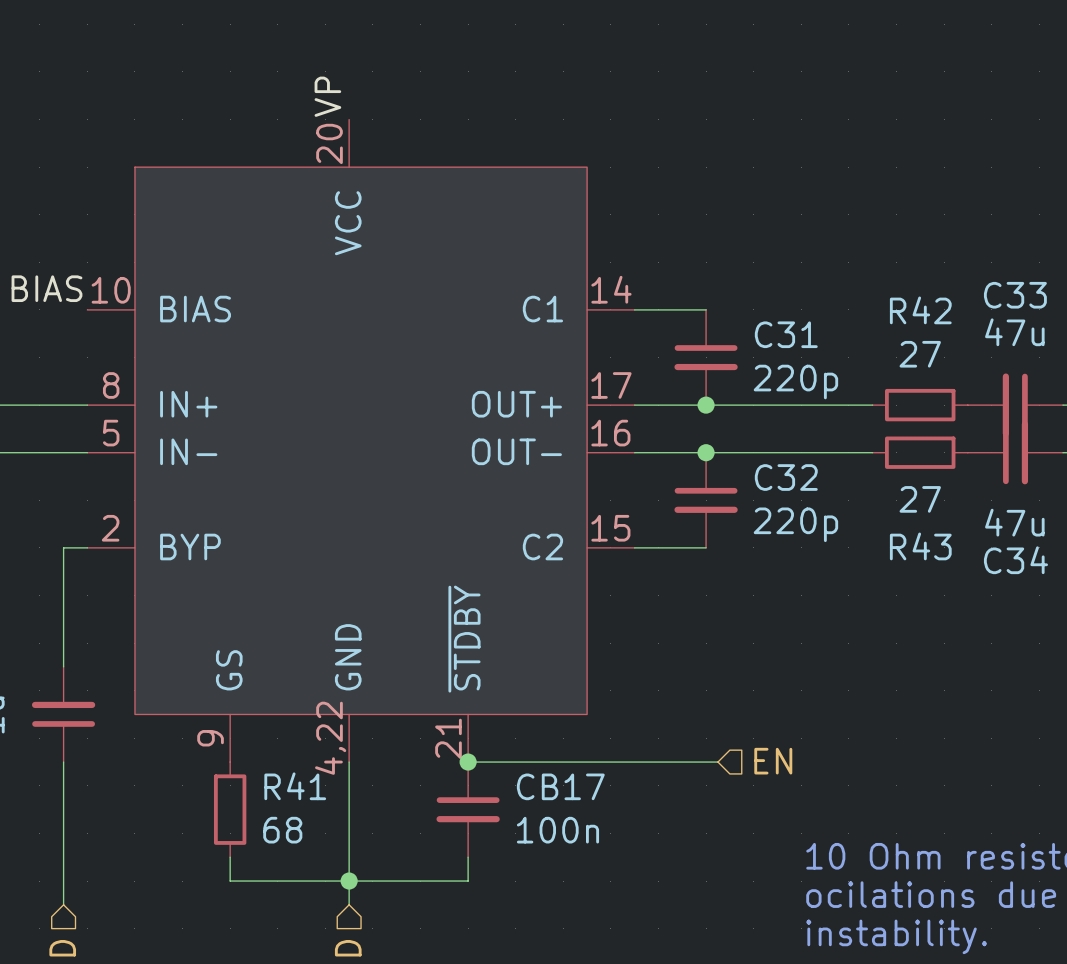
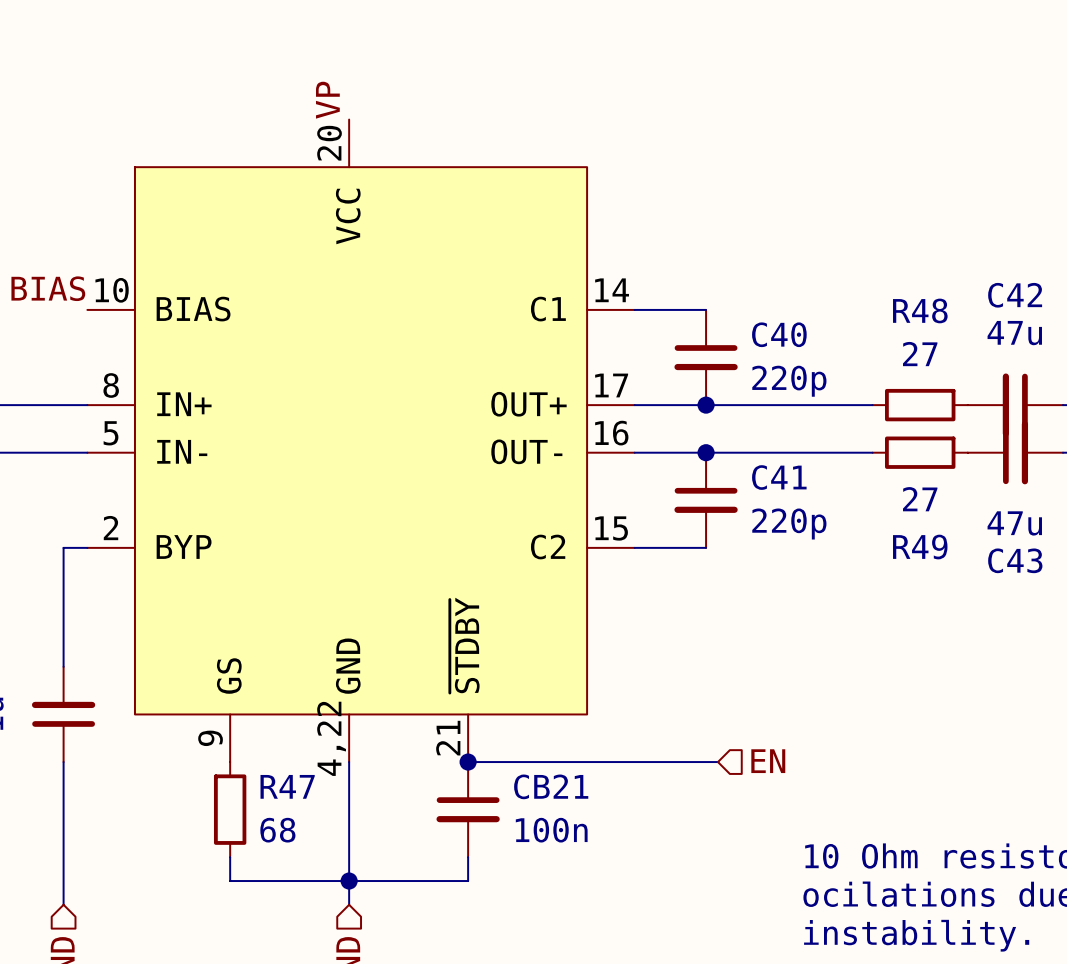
C33 name: C33 (1015, 295) -> C42 (1015, 295)
R42 name: R42 (920, 310) -> R48 (920, 310)
C31 name: C31 (786, 334) -> C40 (779, 334)
C32 name: C32 (786, 477) -> C41 (779, 477)
R43 name: R43 (920, 546) -> R49 (920, 547)
C34 name: C34 (1015, 560) -> C43 (1015, 560)
R41 name: R41 (295, 786) -> R47 (287, 786)
CB17 name: CB17 (560, 786) -> CB21 (551, 786)

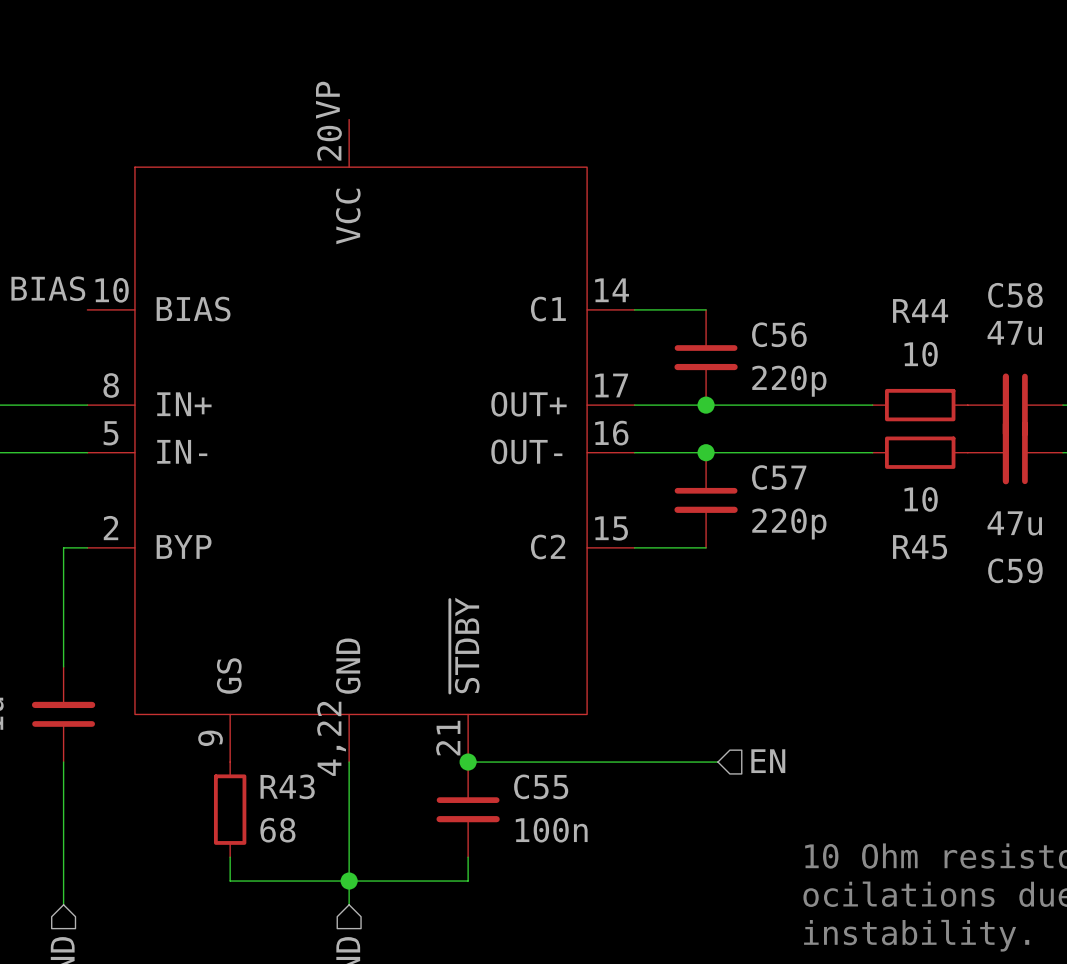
C42 name: C42 (1015, 295) -> C58 (1015, 295)
R48 name: R48 (920, 310) -> R44 (920, 310)
C40 name: C40 (779, 334) -> C56 (779, 334)
R48 value: 27 (920, 354) -> 10 (921, 354)
C43: 47u (1015, 452) -> none
C59: none -> 47u (1015, 452)
C41 name: C41 (779, 477) -> C57 (779, 477)
R49 value: 27 (920, 499) -> 10 (921, 499)
R49 name: R49 (920, 547) -> R45 (920, 547)
R47 name: R47 (287, 786) -> R43 (287, 786)
CB21 name: CB21 (551, 786) -> C55 (541, 786)

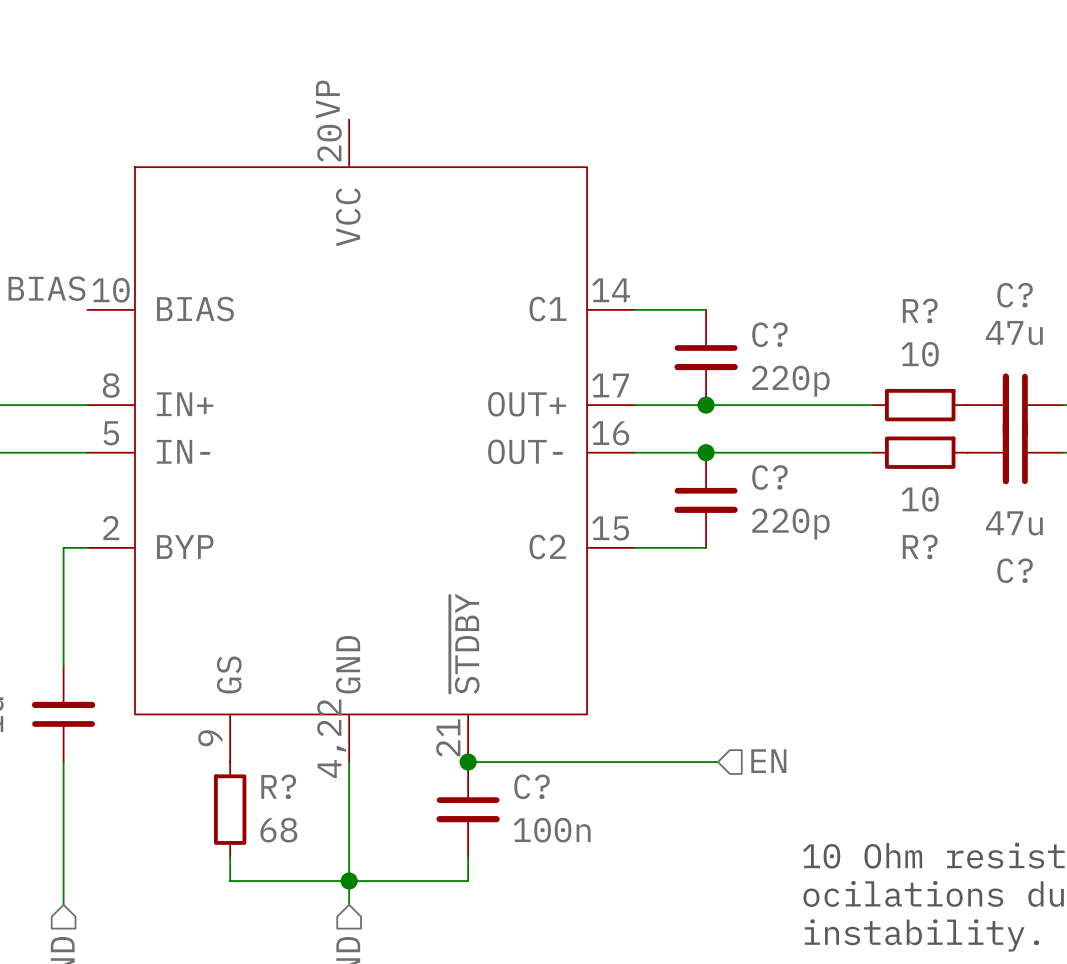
C58 name: C58 (1015, 295) -> C? (1015, 295)
R44 name: R44 (920, 310) -> R? (920, 310)
C56 name: C56 (779, 334) -> C? (769, 334)
C57 name: C57 (779, 477) -> C? (769, 477)
R45 name: R45 (920, 547) -> R? (920, 546)
C59 name: C59 (1015, 570) -> C? (1015, 570)
R43 name: R43 (287, 786) -> R? (278, 786)
C55 name: C55 (541, 786) -> C? (532, 786)

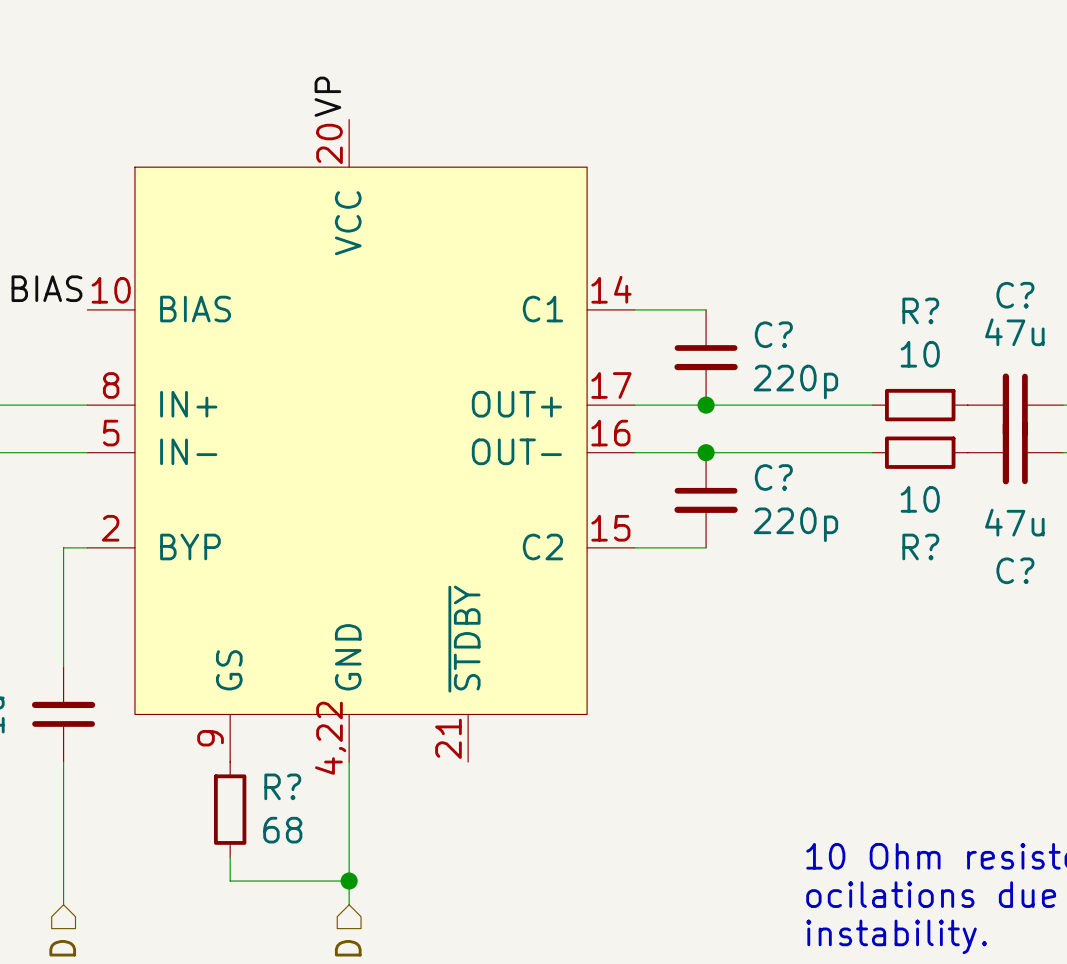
hierarchical label: EN (768, 761) -> none
wire: (468, 762) (717, 762) -> none
junction: (468, 762) -> none
C?: 100n (468, 809) -> none
wire: (468, 857) (468, 881) (349, 881) -> none

